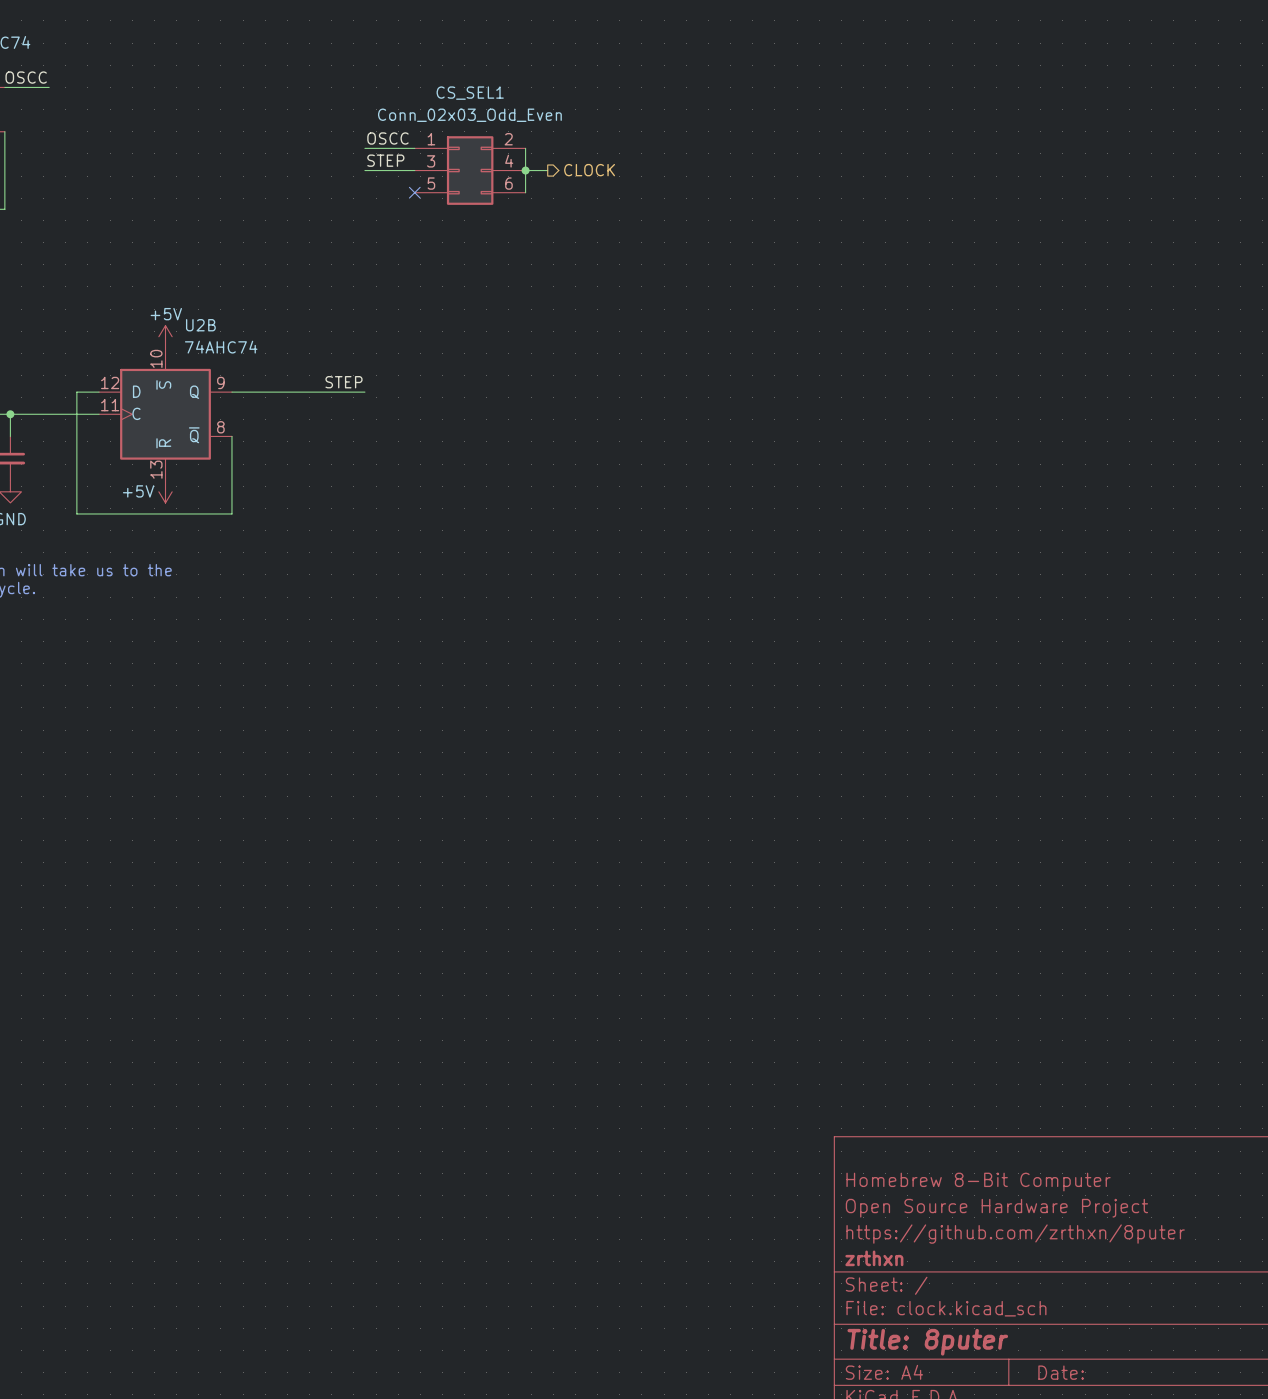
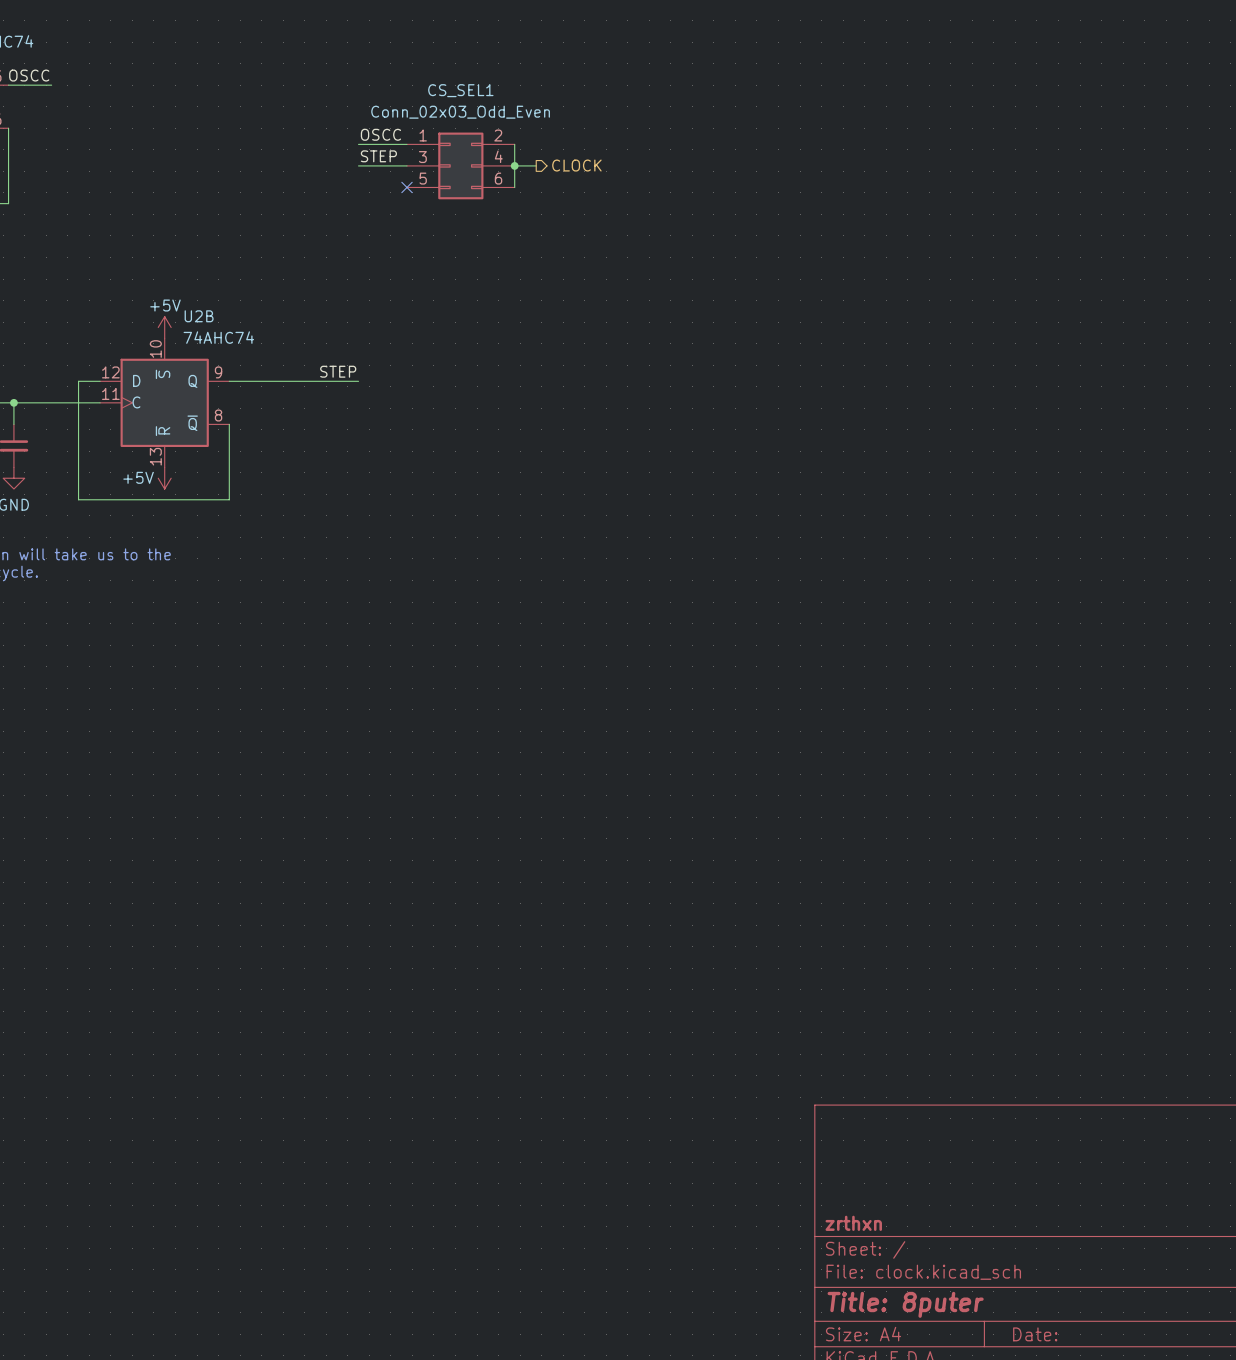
title block: Homebrew 8-Bit Computer (978, 1182) -> none
title block: Open Source Hardware Project (996, 1208) -> none
title block: https://github.com/zrthxn/8puter (1015, 1234) -> none

